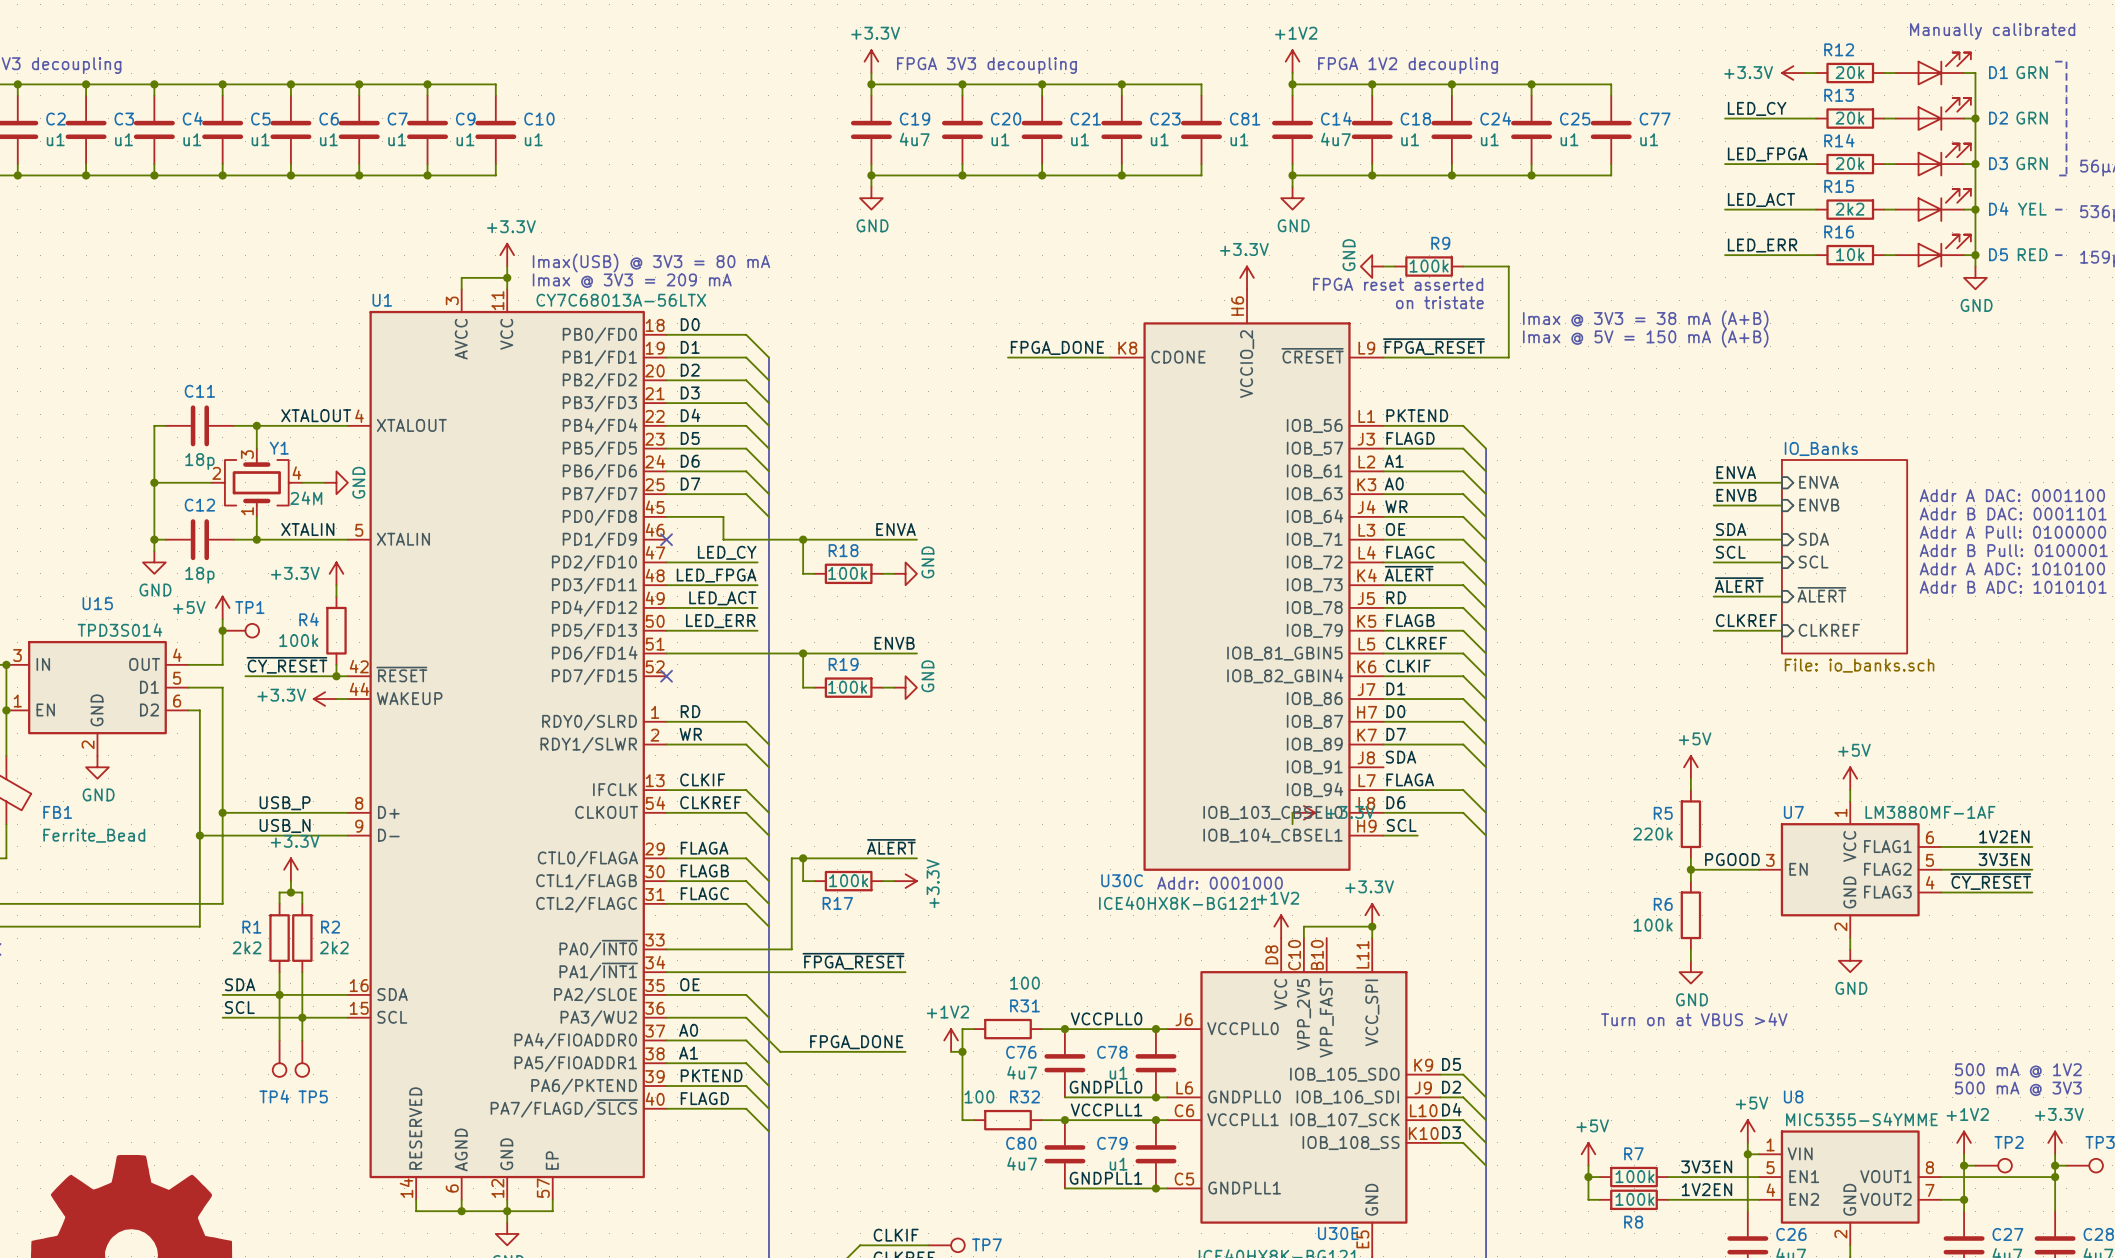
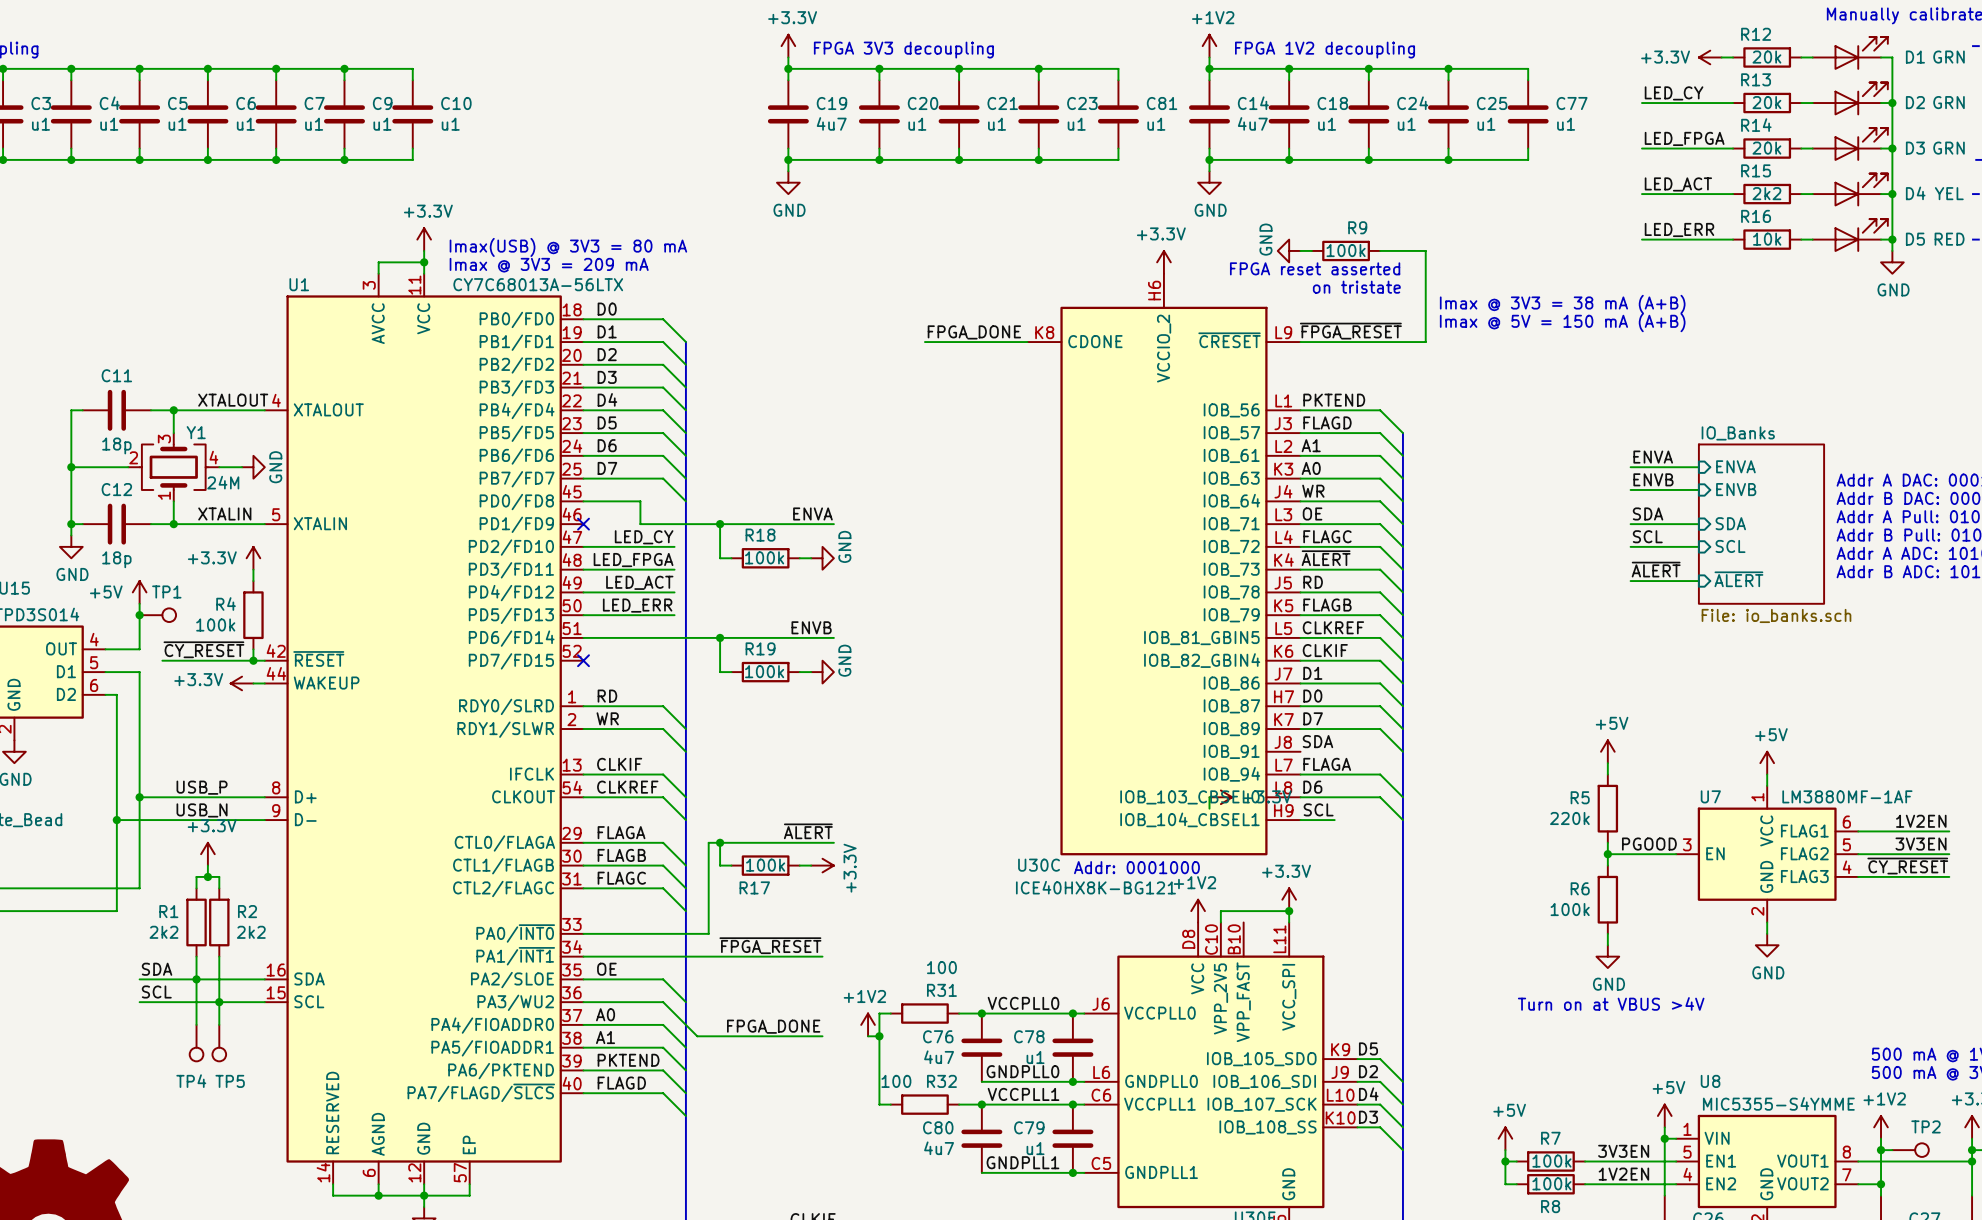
sheet IO_Banks: none -> File: io_banks.sch (1761, 524)
sheet IO_Banks: File: io_banks.sch (1844, 556) -> none
label: CLKREF (1746, 620) -> none
wire: (1713, 630) (1781, 630) -> none
sheet pin: CLKREF (1829, 630) -> none

